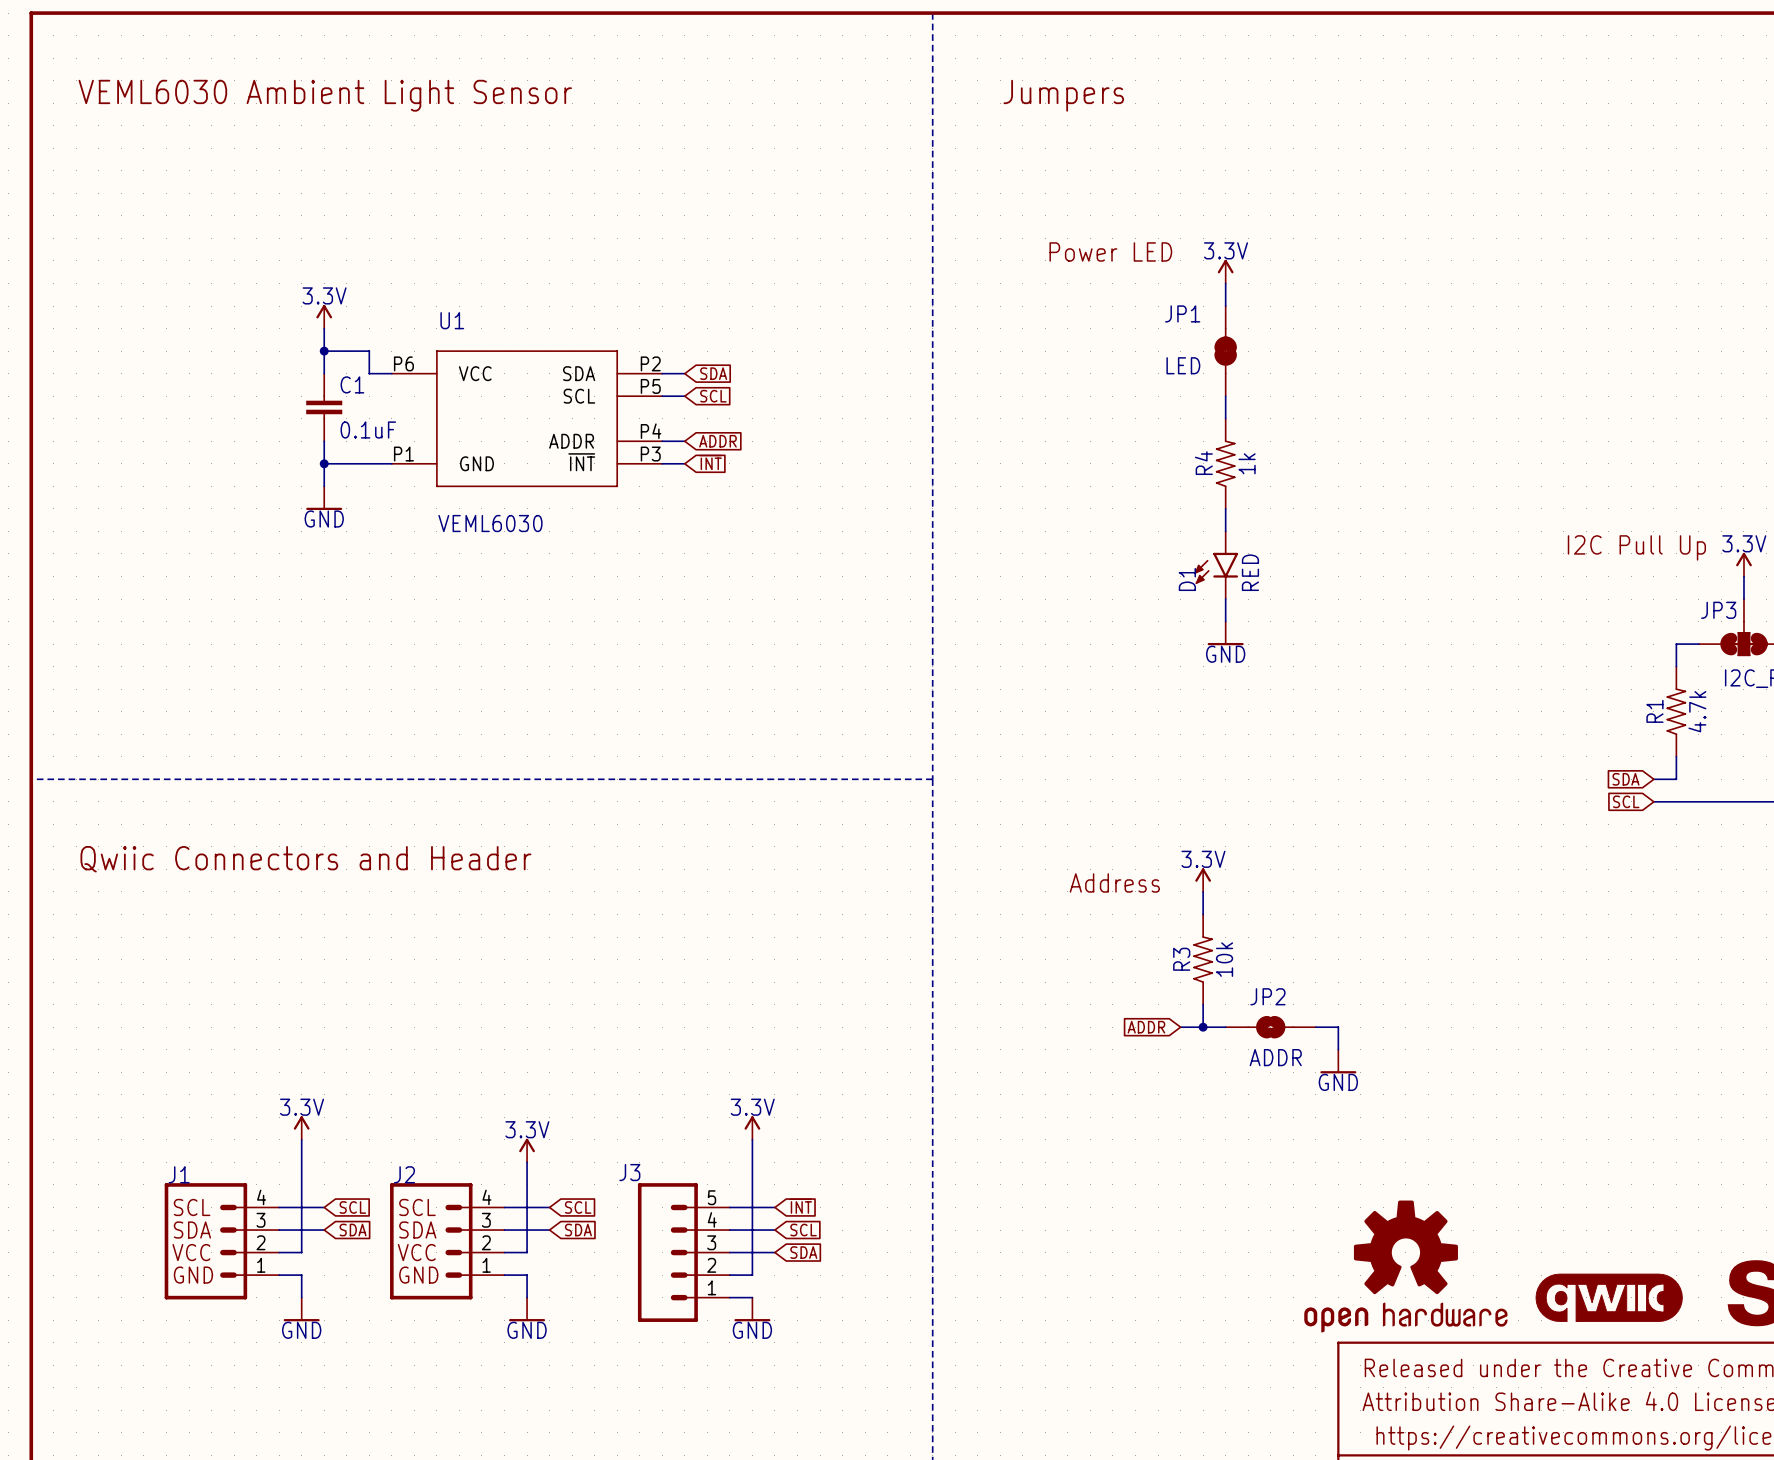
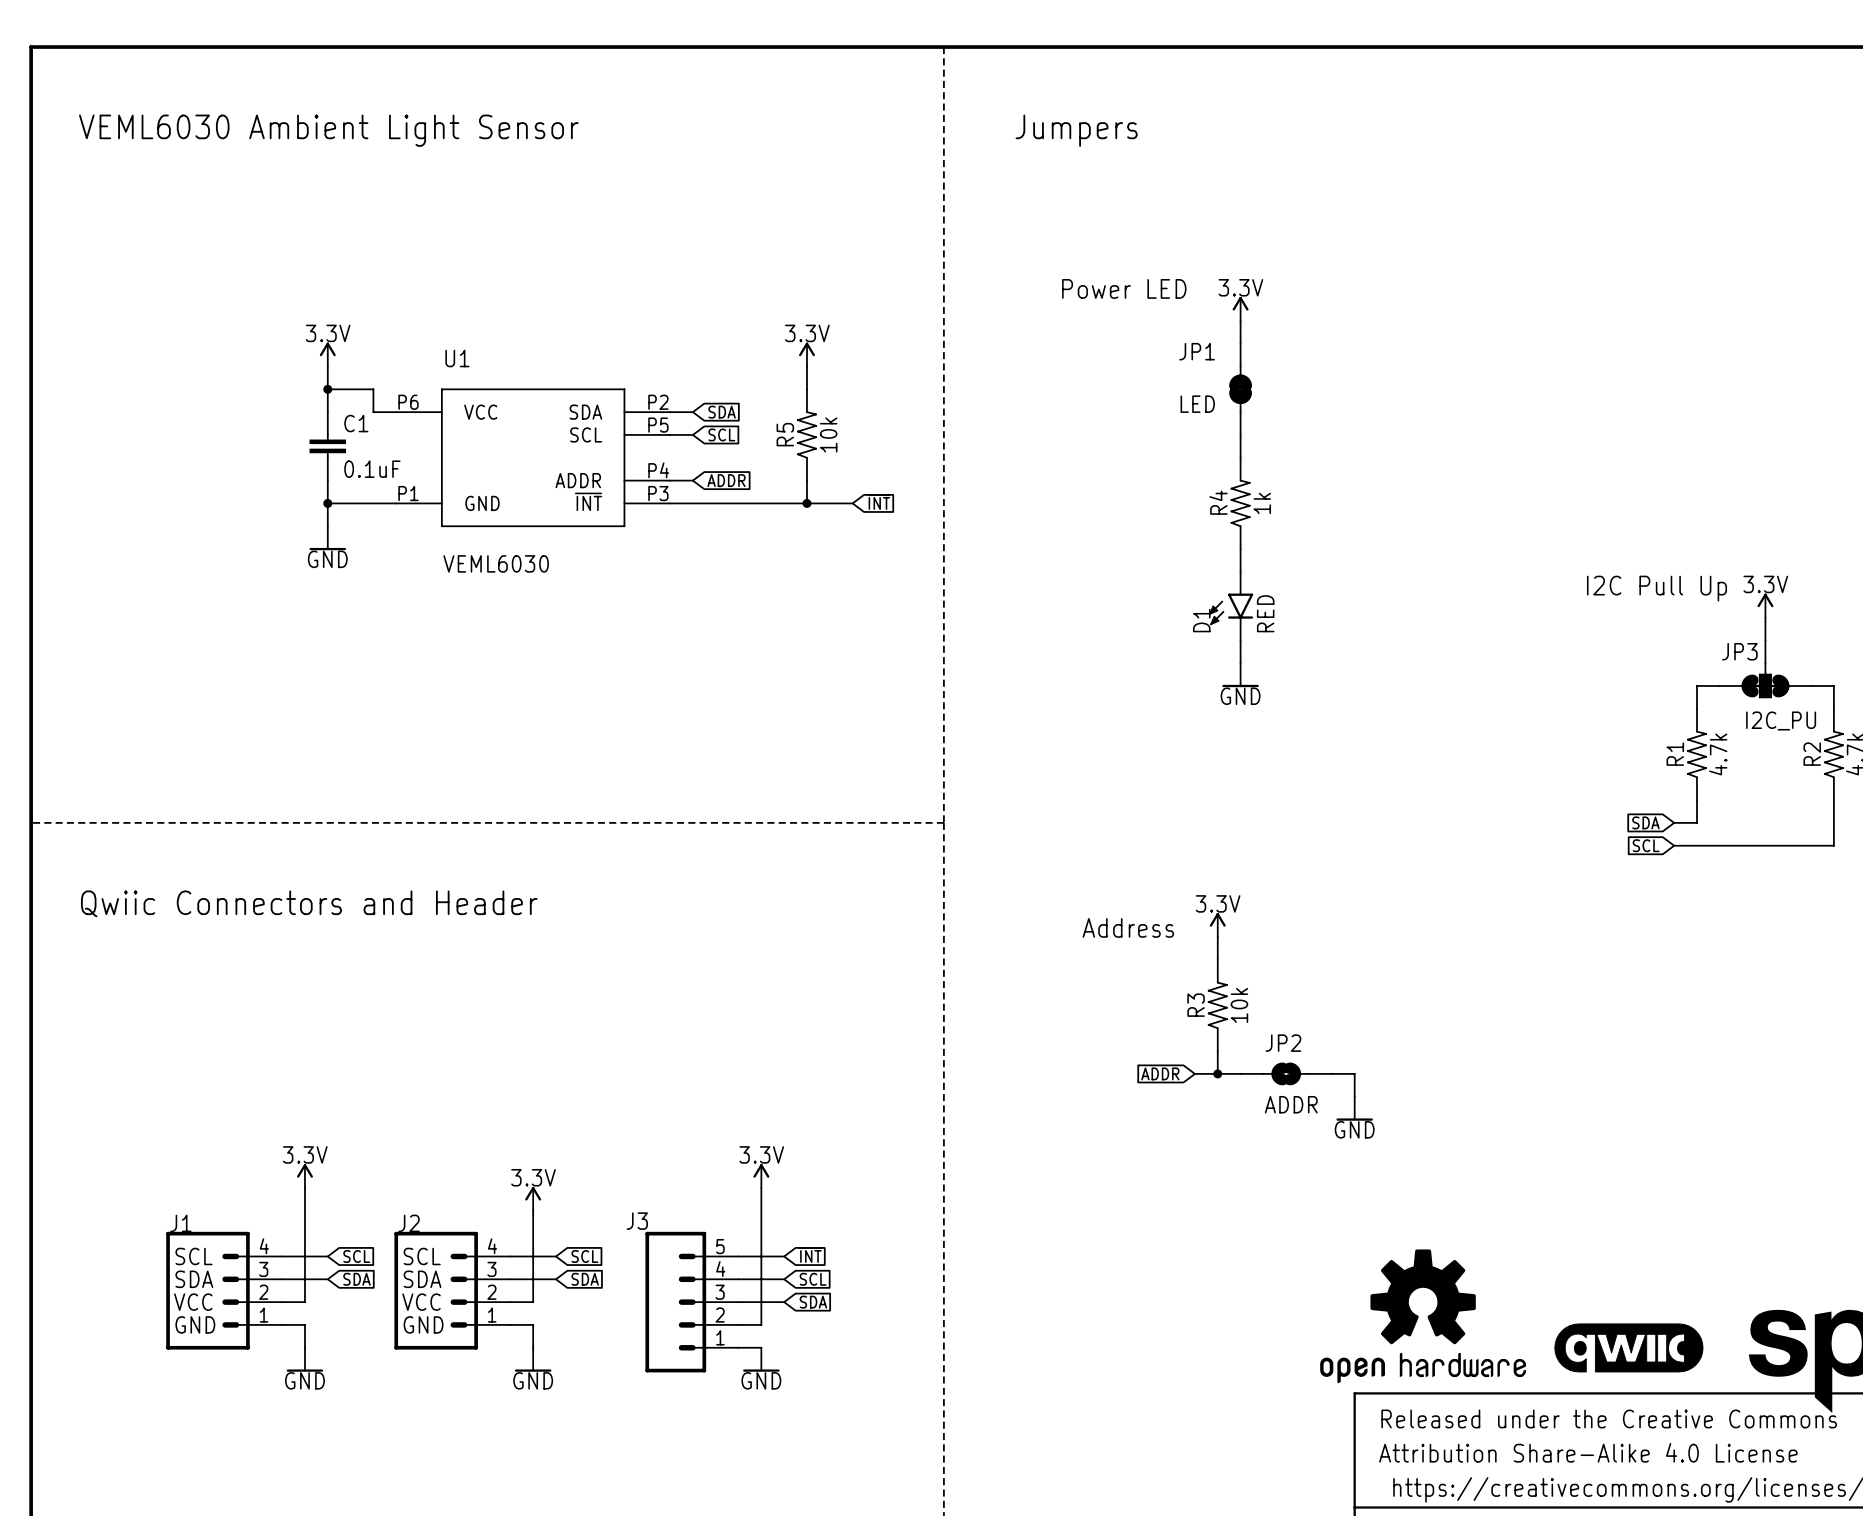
power symbol: none -> 3.3V (807, 354)
wire: none -> (807, 366) (807, 389)
R5: none -> 10k (807, 434)
wire: none -> (807, 480) (807, 503)
global label position: ~{INT} (710, 462) -> ~{INT} (878, 502)
wire: none -> (692, 503) (852, 503)
junction: none -> (807, 503)

